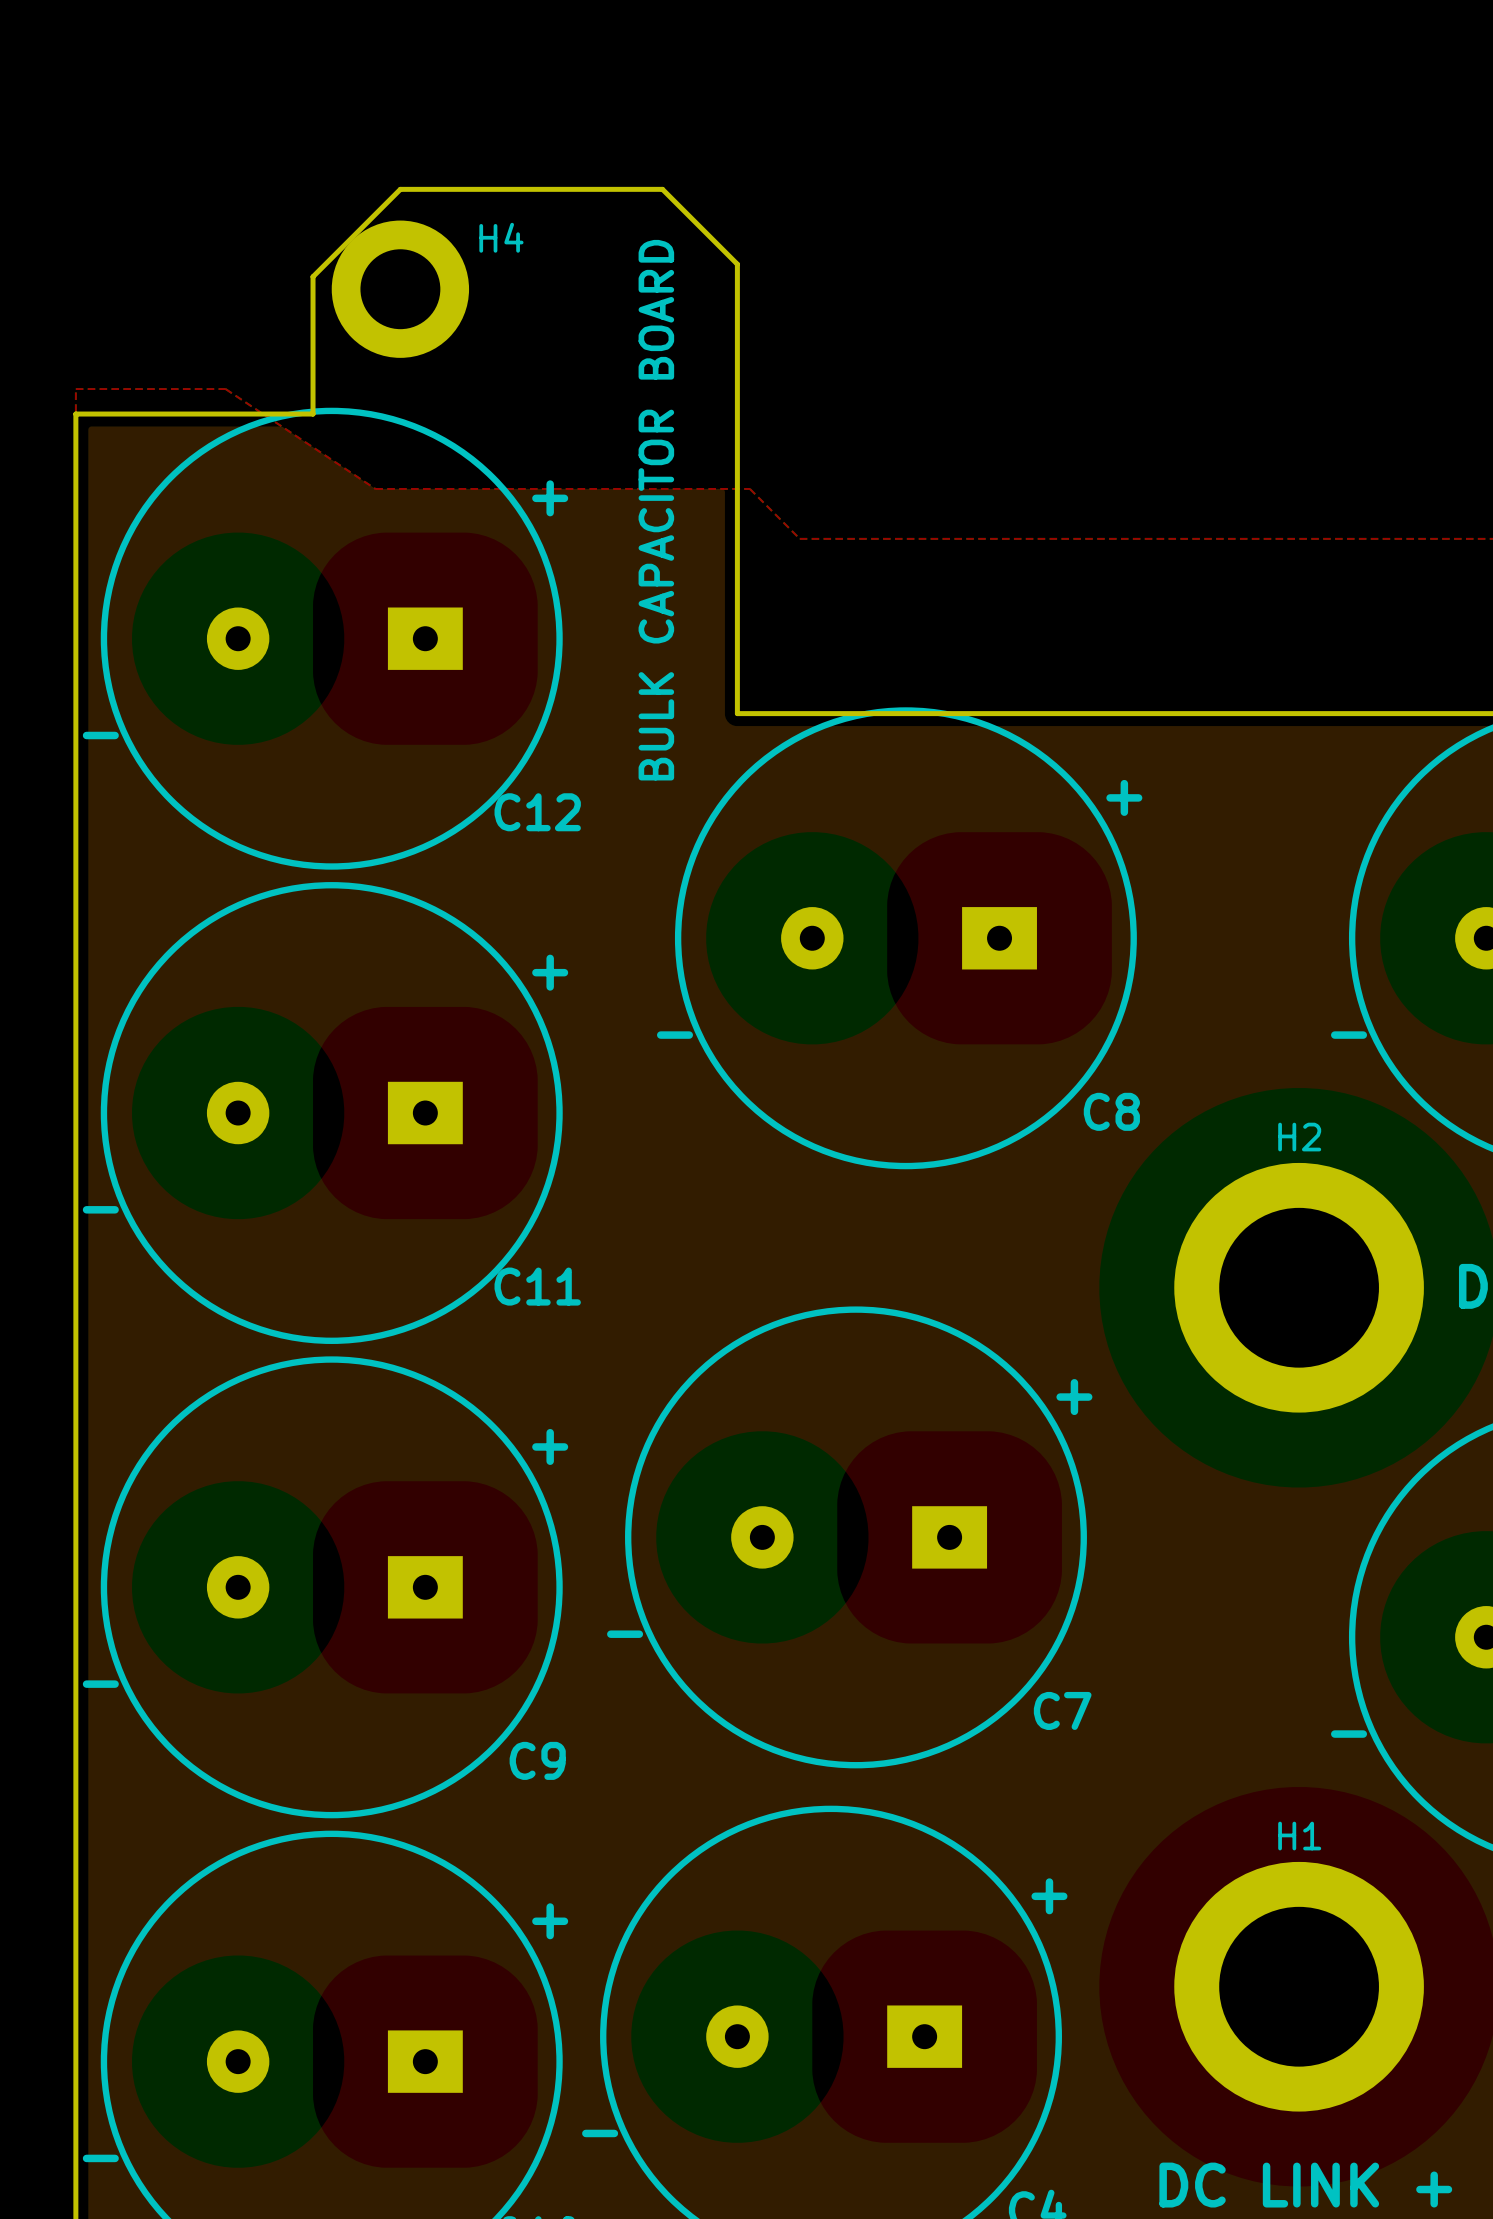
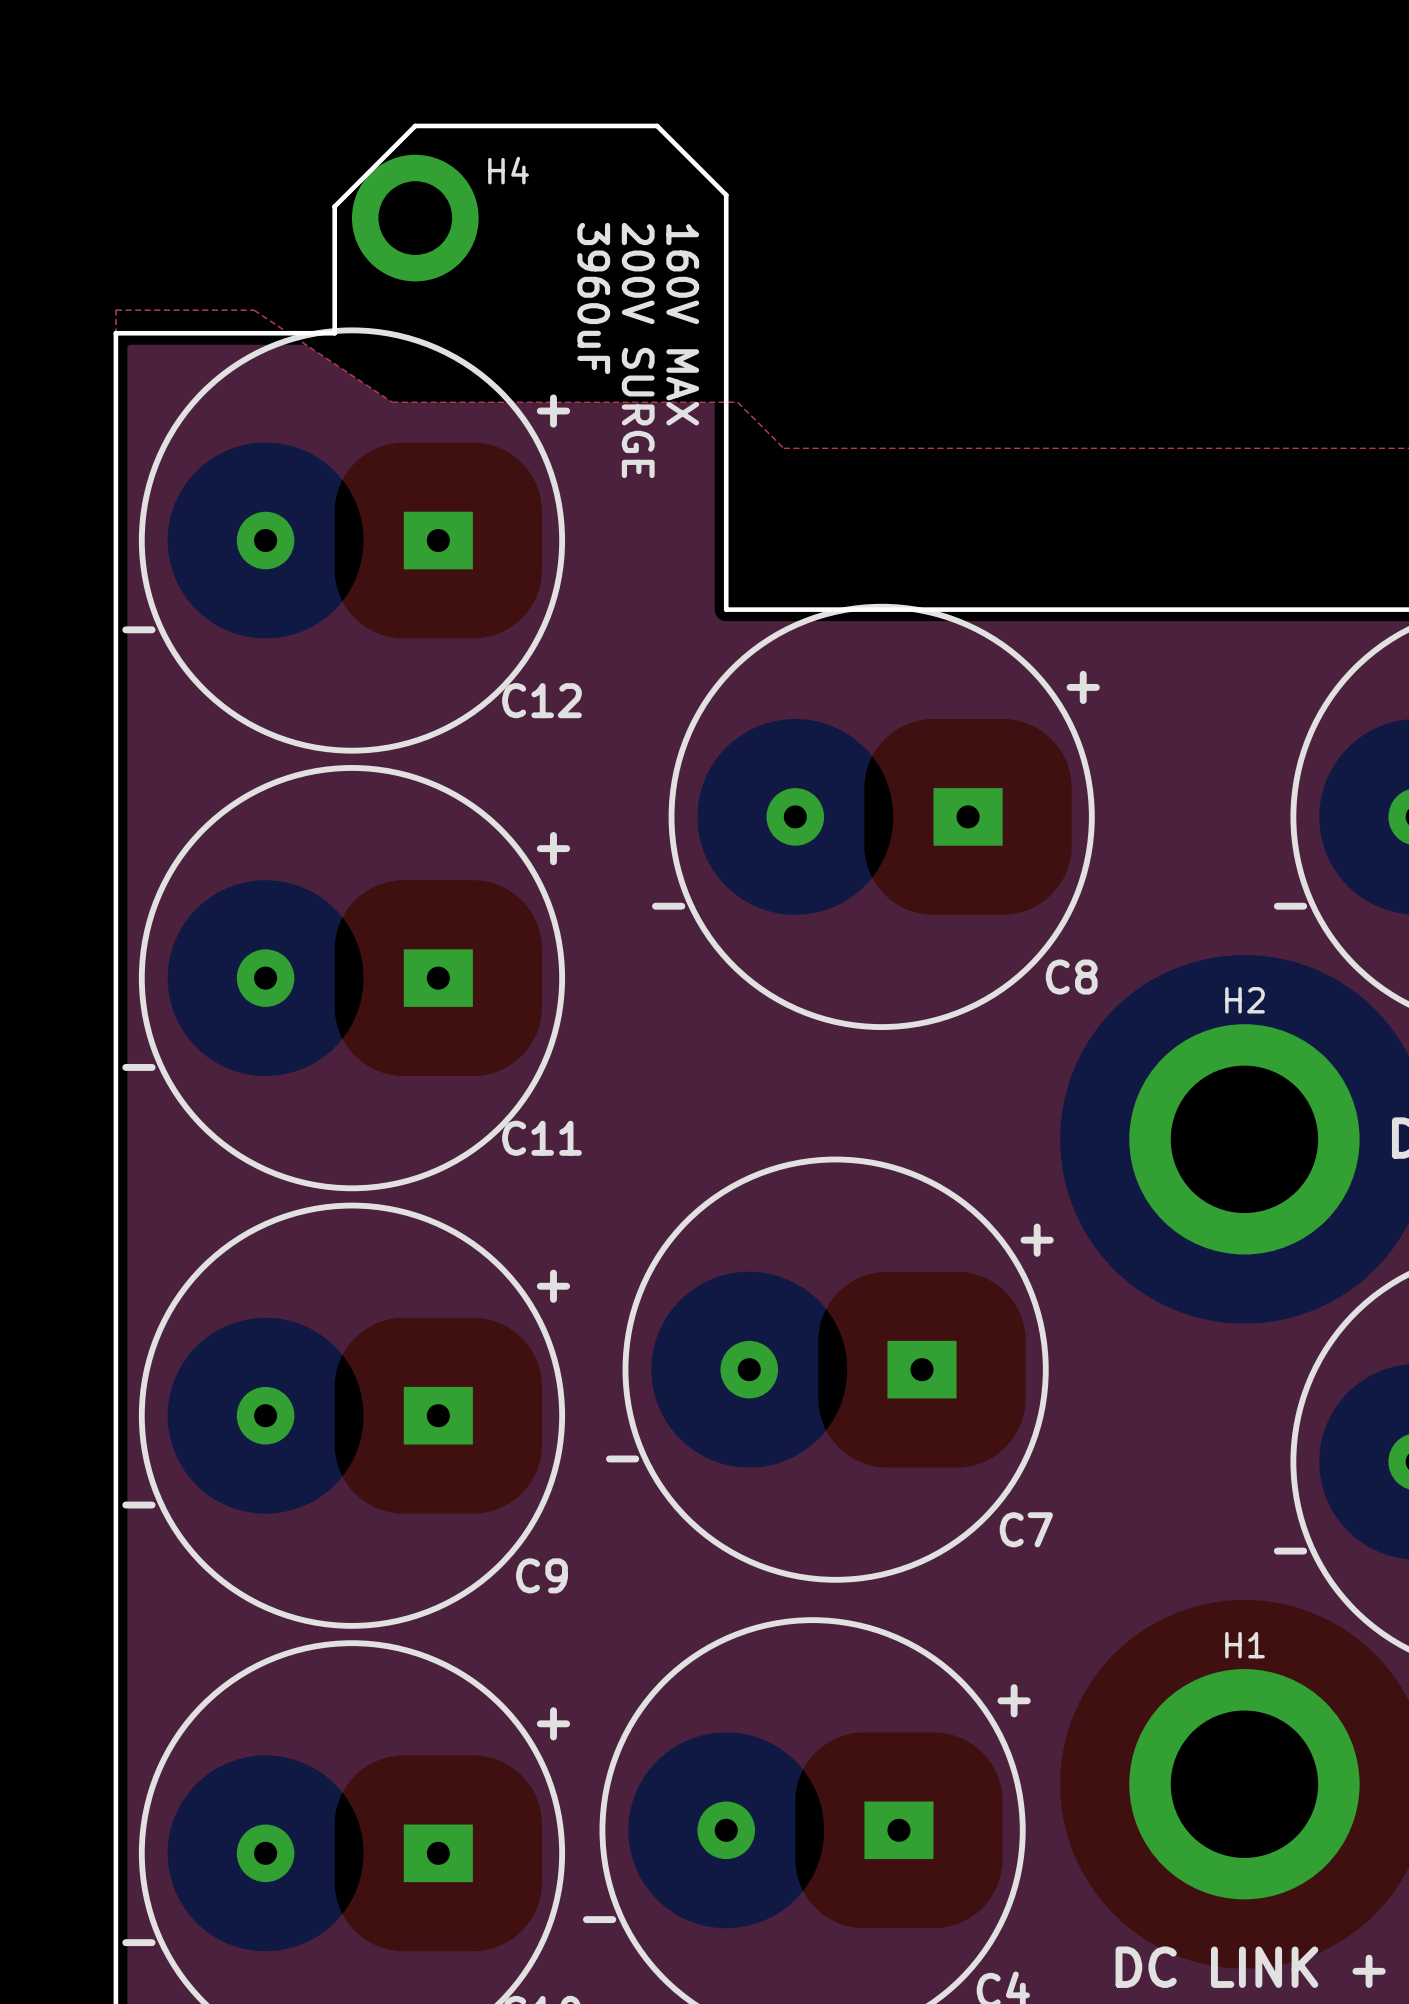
text: none -> 3960uF (593, 298)
text: none -> 160V MAX (682, 324)
text: none -> 200V SURGE (638, 350)
text: BULK CAPACITOR BOARD (656, 510) -> none

